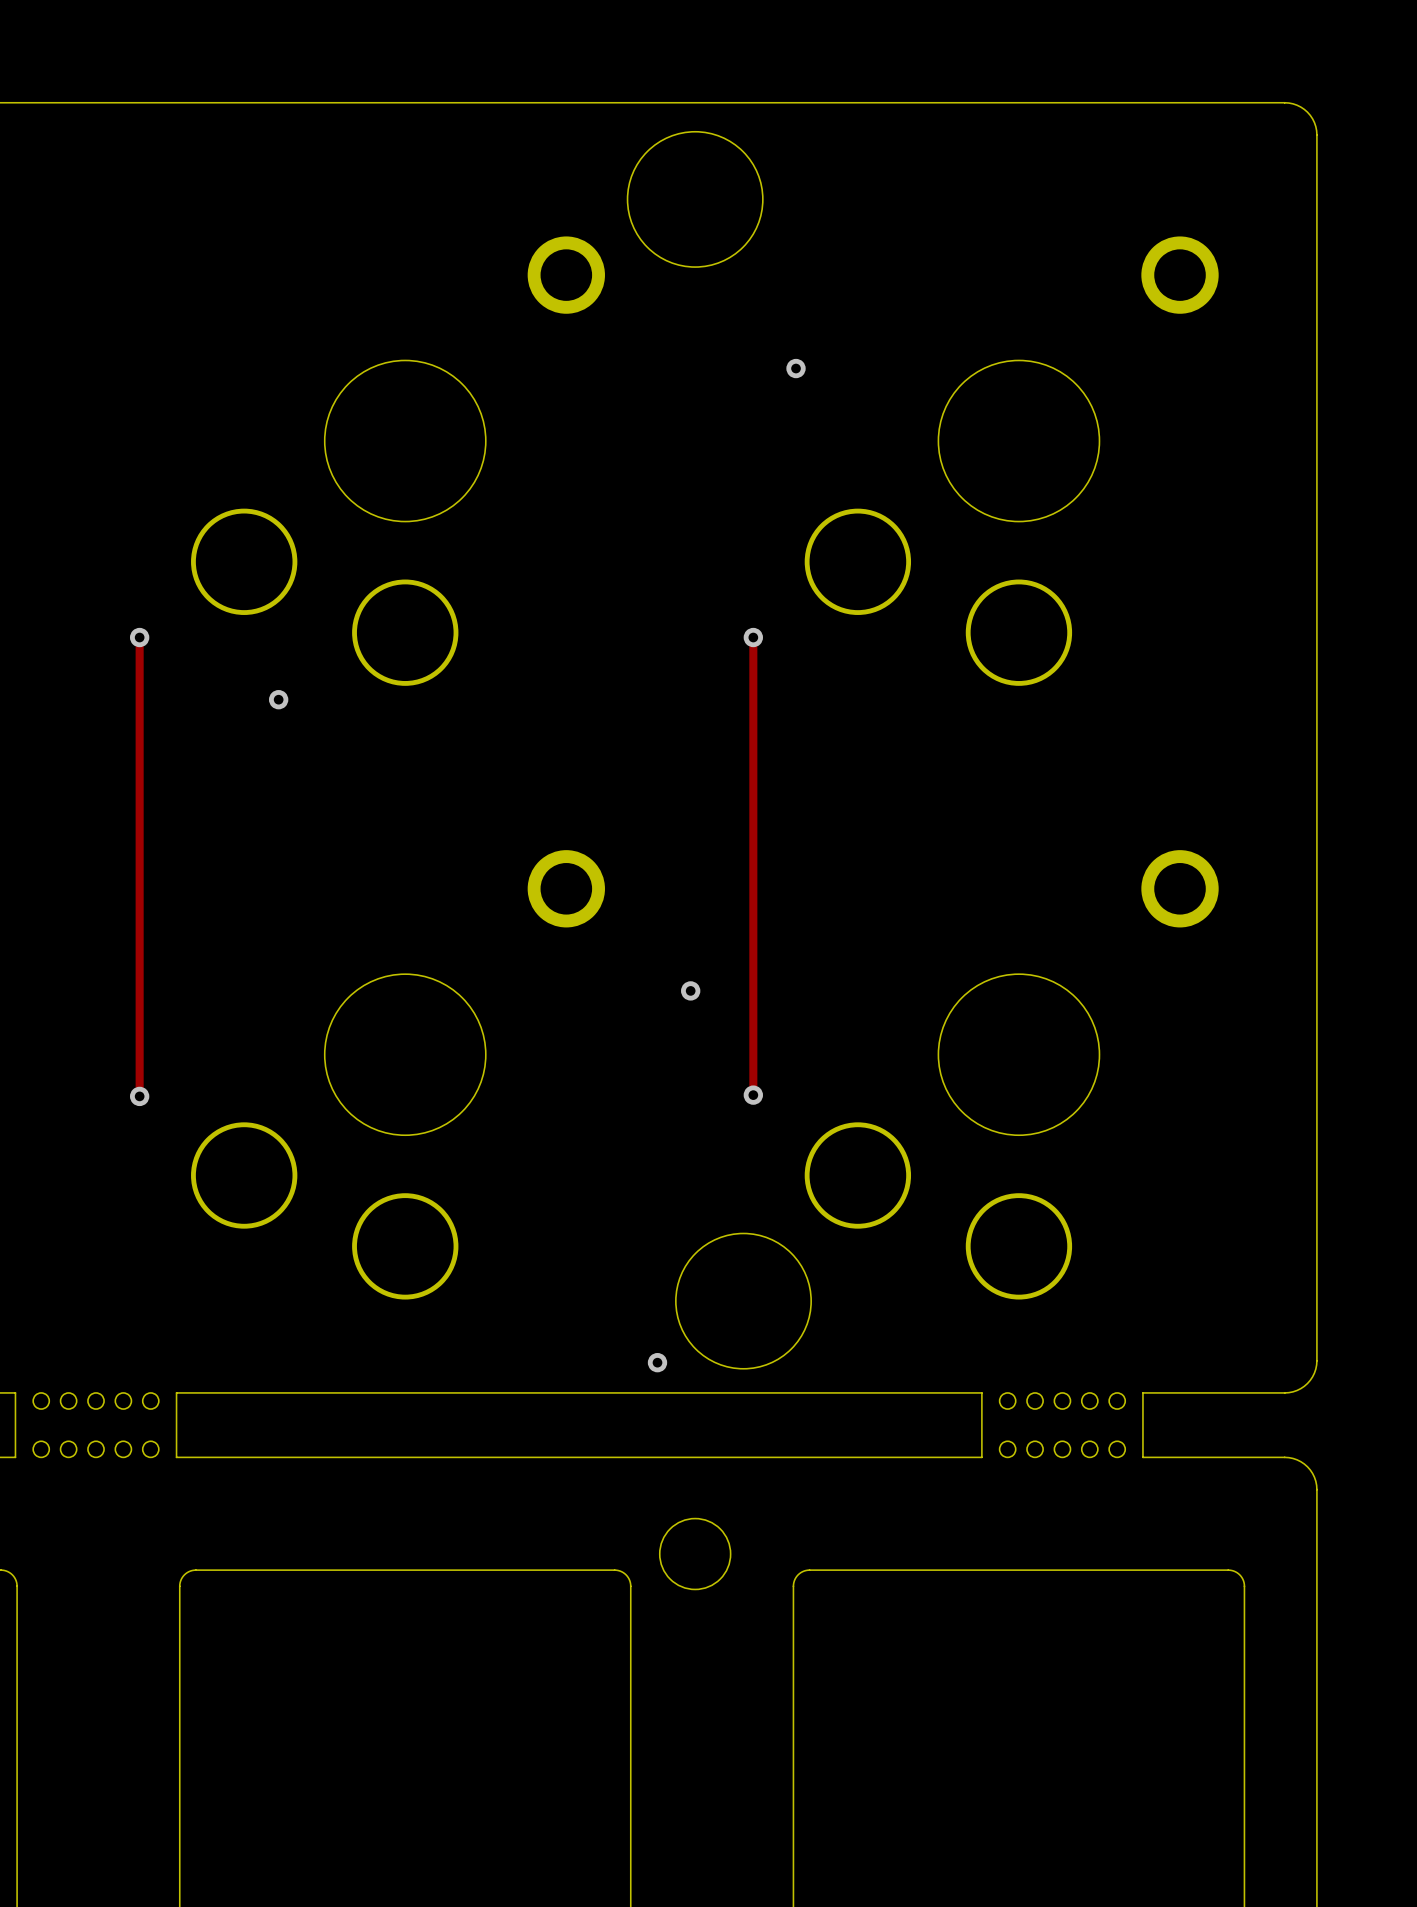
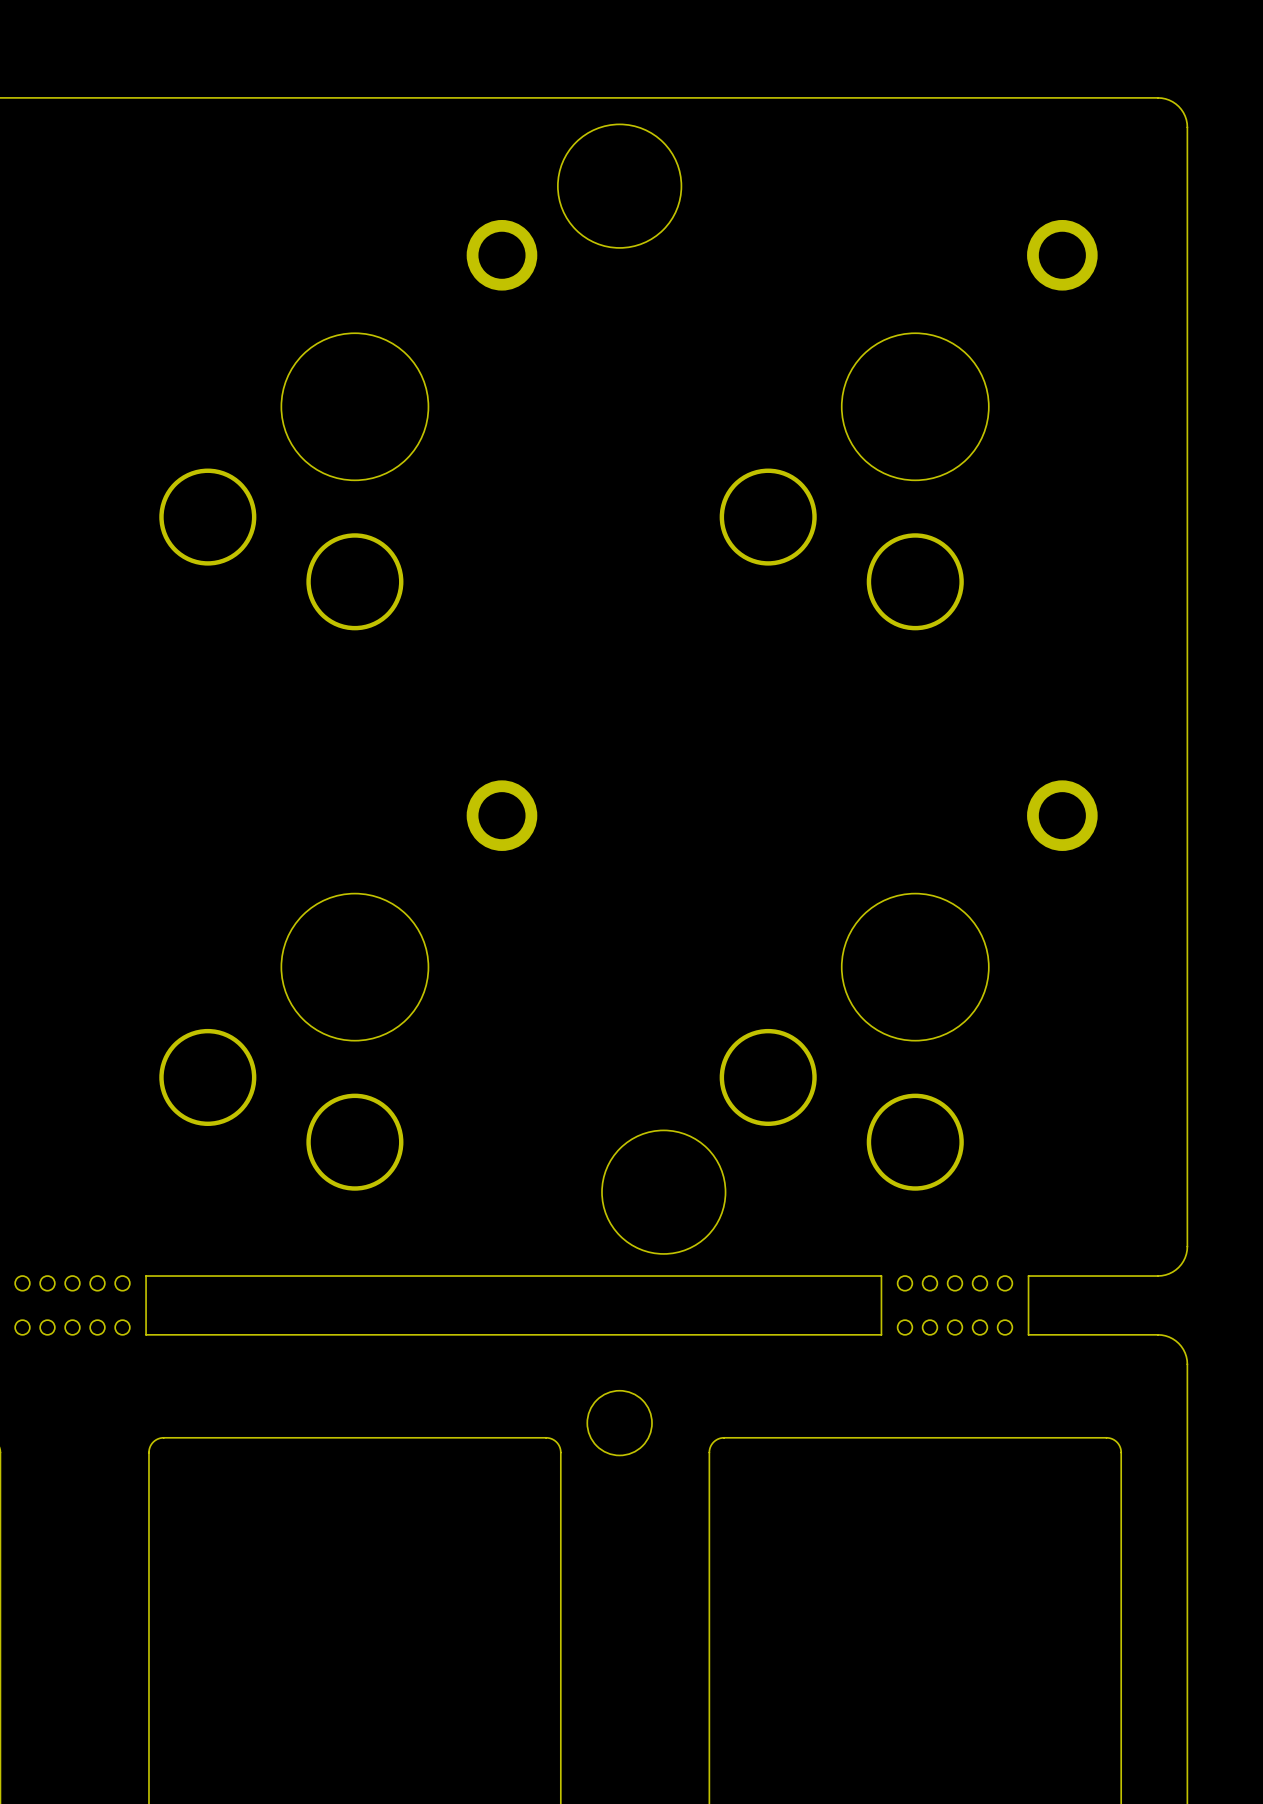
via: (796, 368) -> none
track: (139, 637) (139, 1096) -> none
via: (139, 637) -> none
track: (753, 637) (753, 1095) -> none
via: (753, 637) -> none
via: (278, 699) -> none
via: (690, 990) -> none
via: (753, 1095) -> none
via: (139, 1096) -> none
via: (657, 1362) -> none

